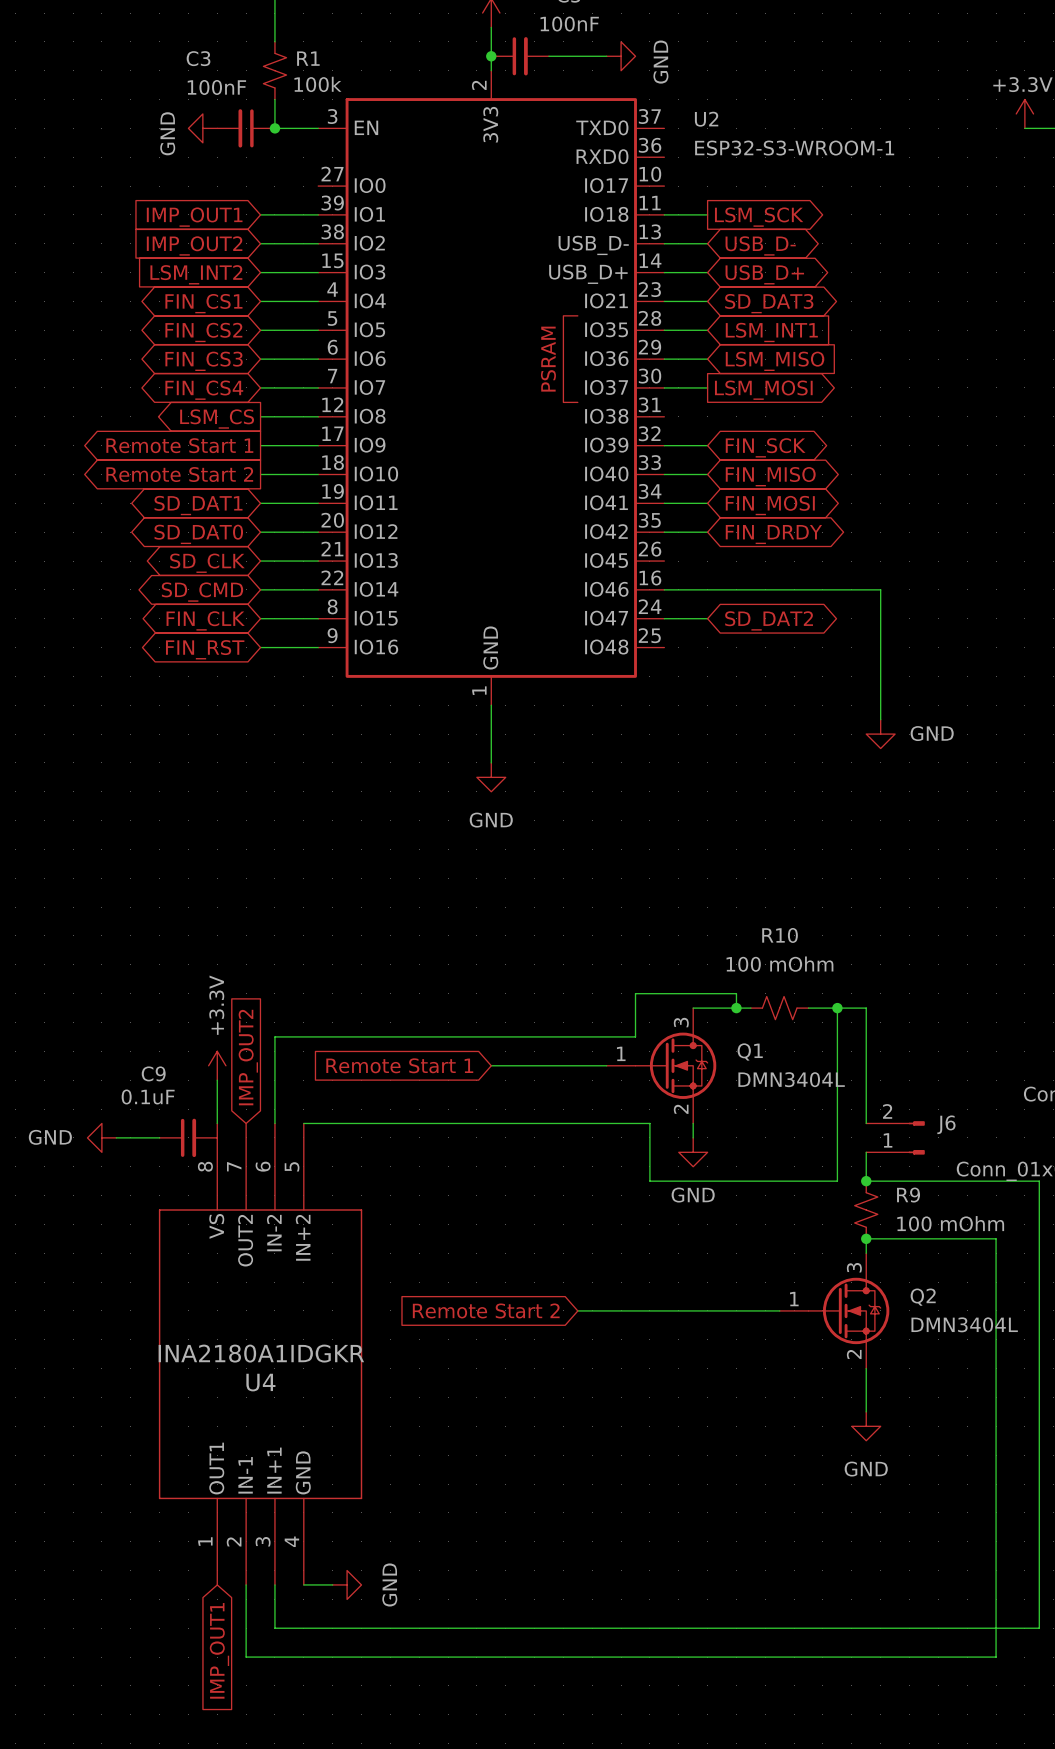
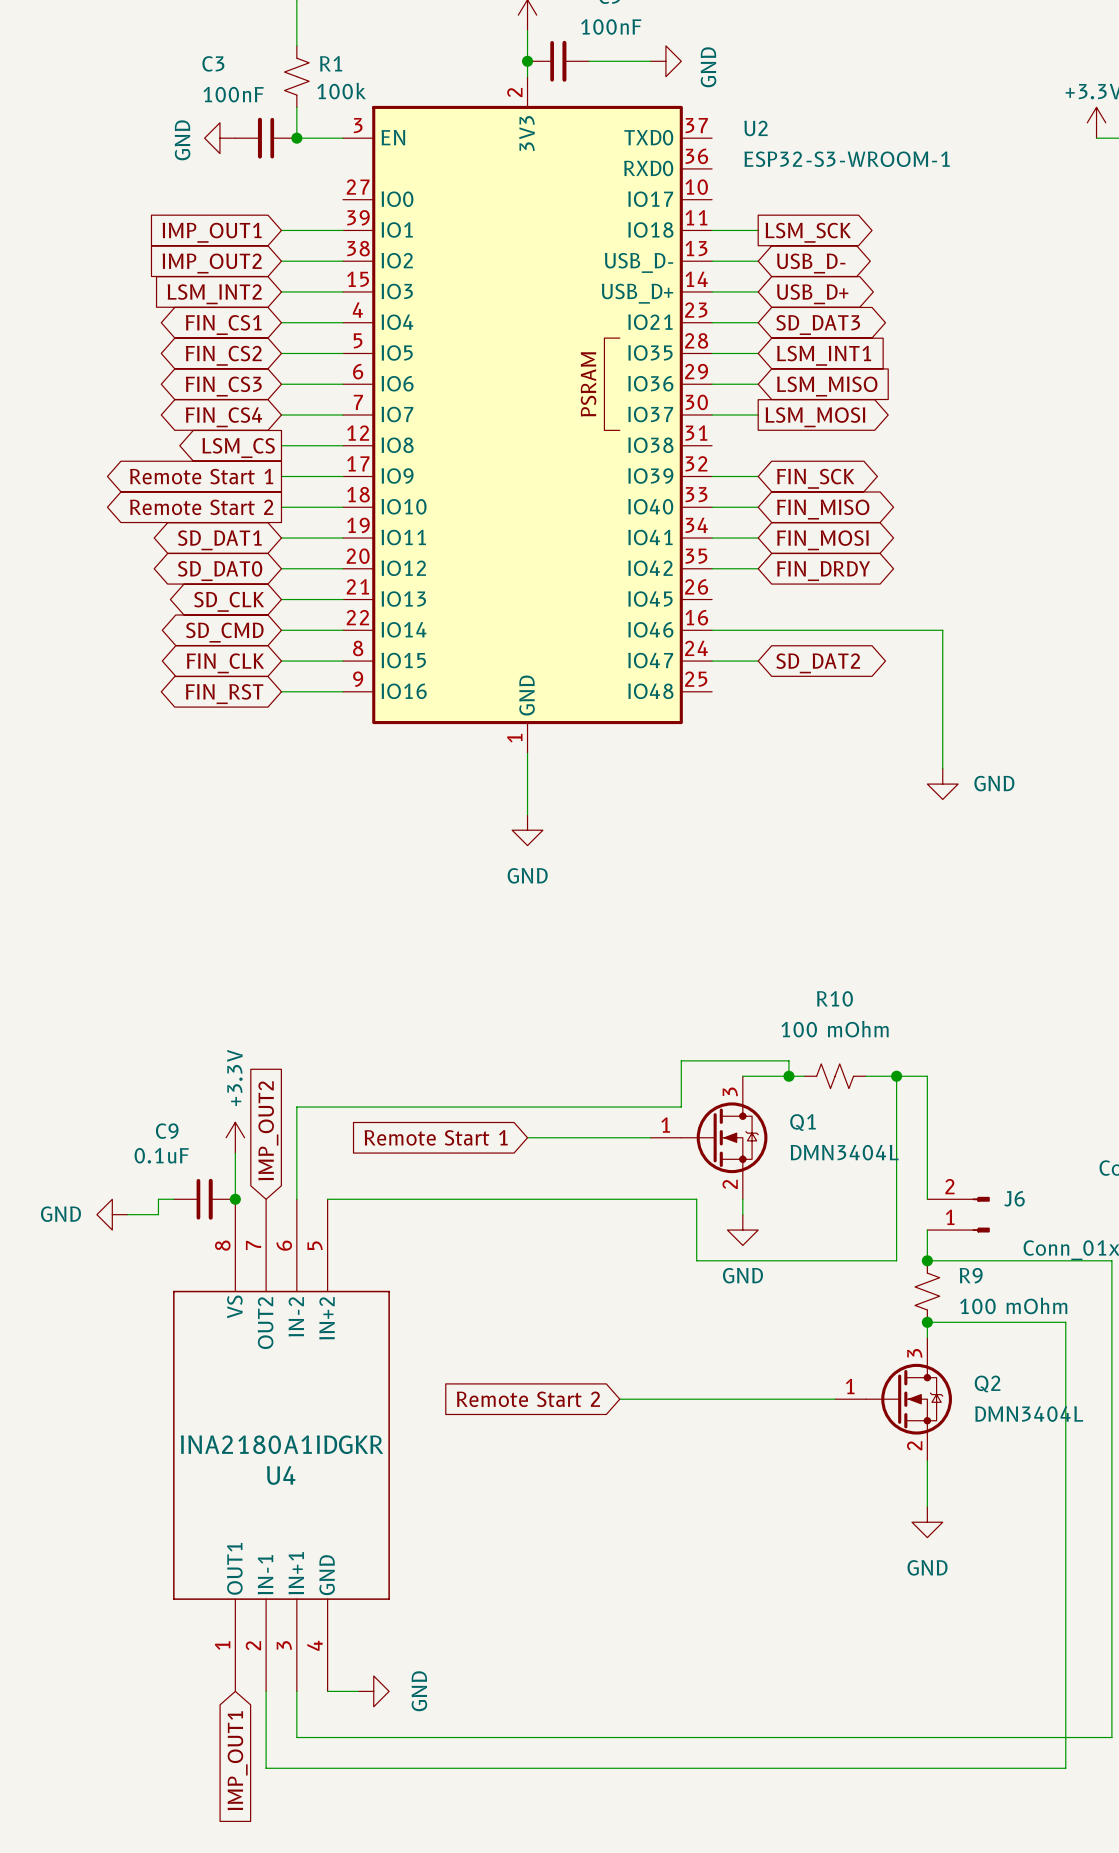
junction: none -> (235, 1199)
wire: (145, 1137) (159, 1137) -> (158, 1214) (158, 1199) (173, 1199)
C9 position: (188, 1137) -> (204, 1199)

